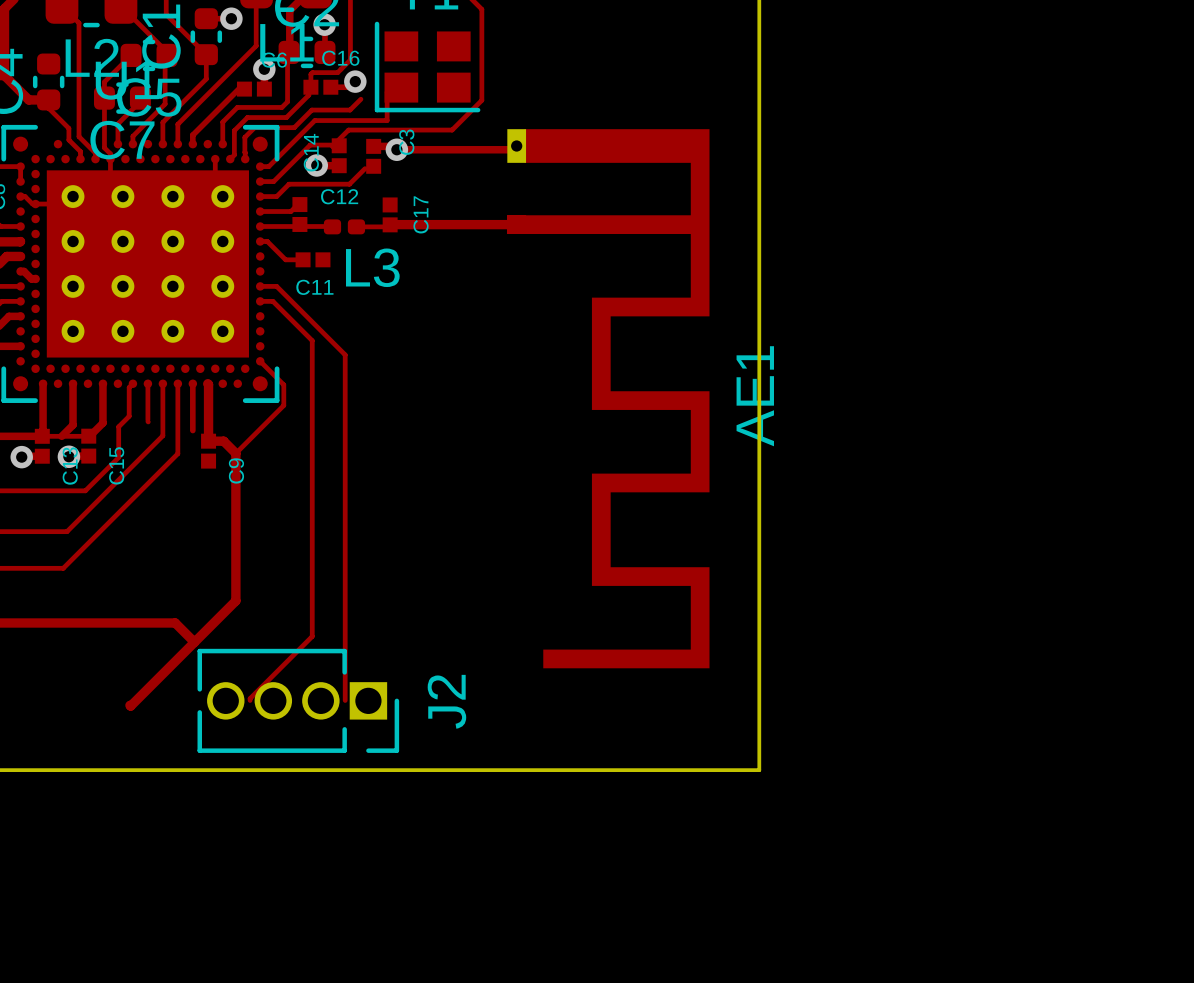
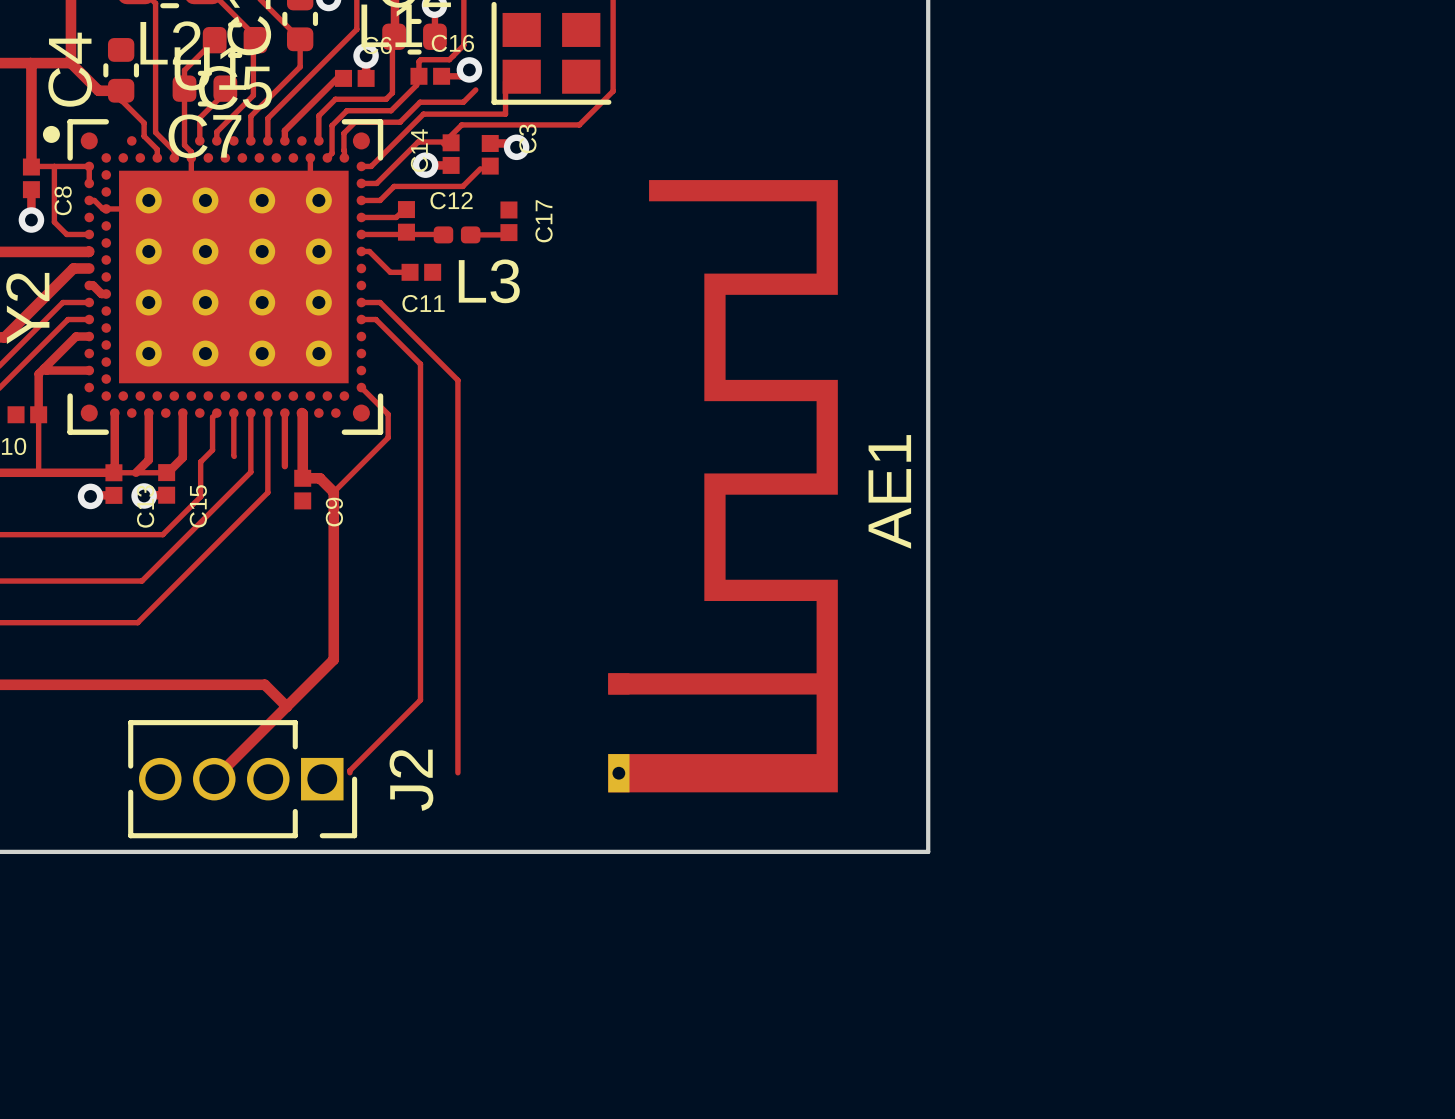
AE1 footprint: [507, 129, 710, 669] -> [608, 180, 838, 793]
track: (516, 146) (512, 149) (396, 149) -> none
track: (390, 224) (516, 224) -> none
J2 position: (298, 700) -> (242, 779)

